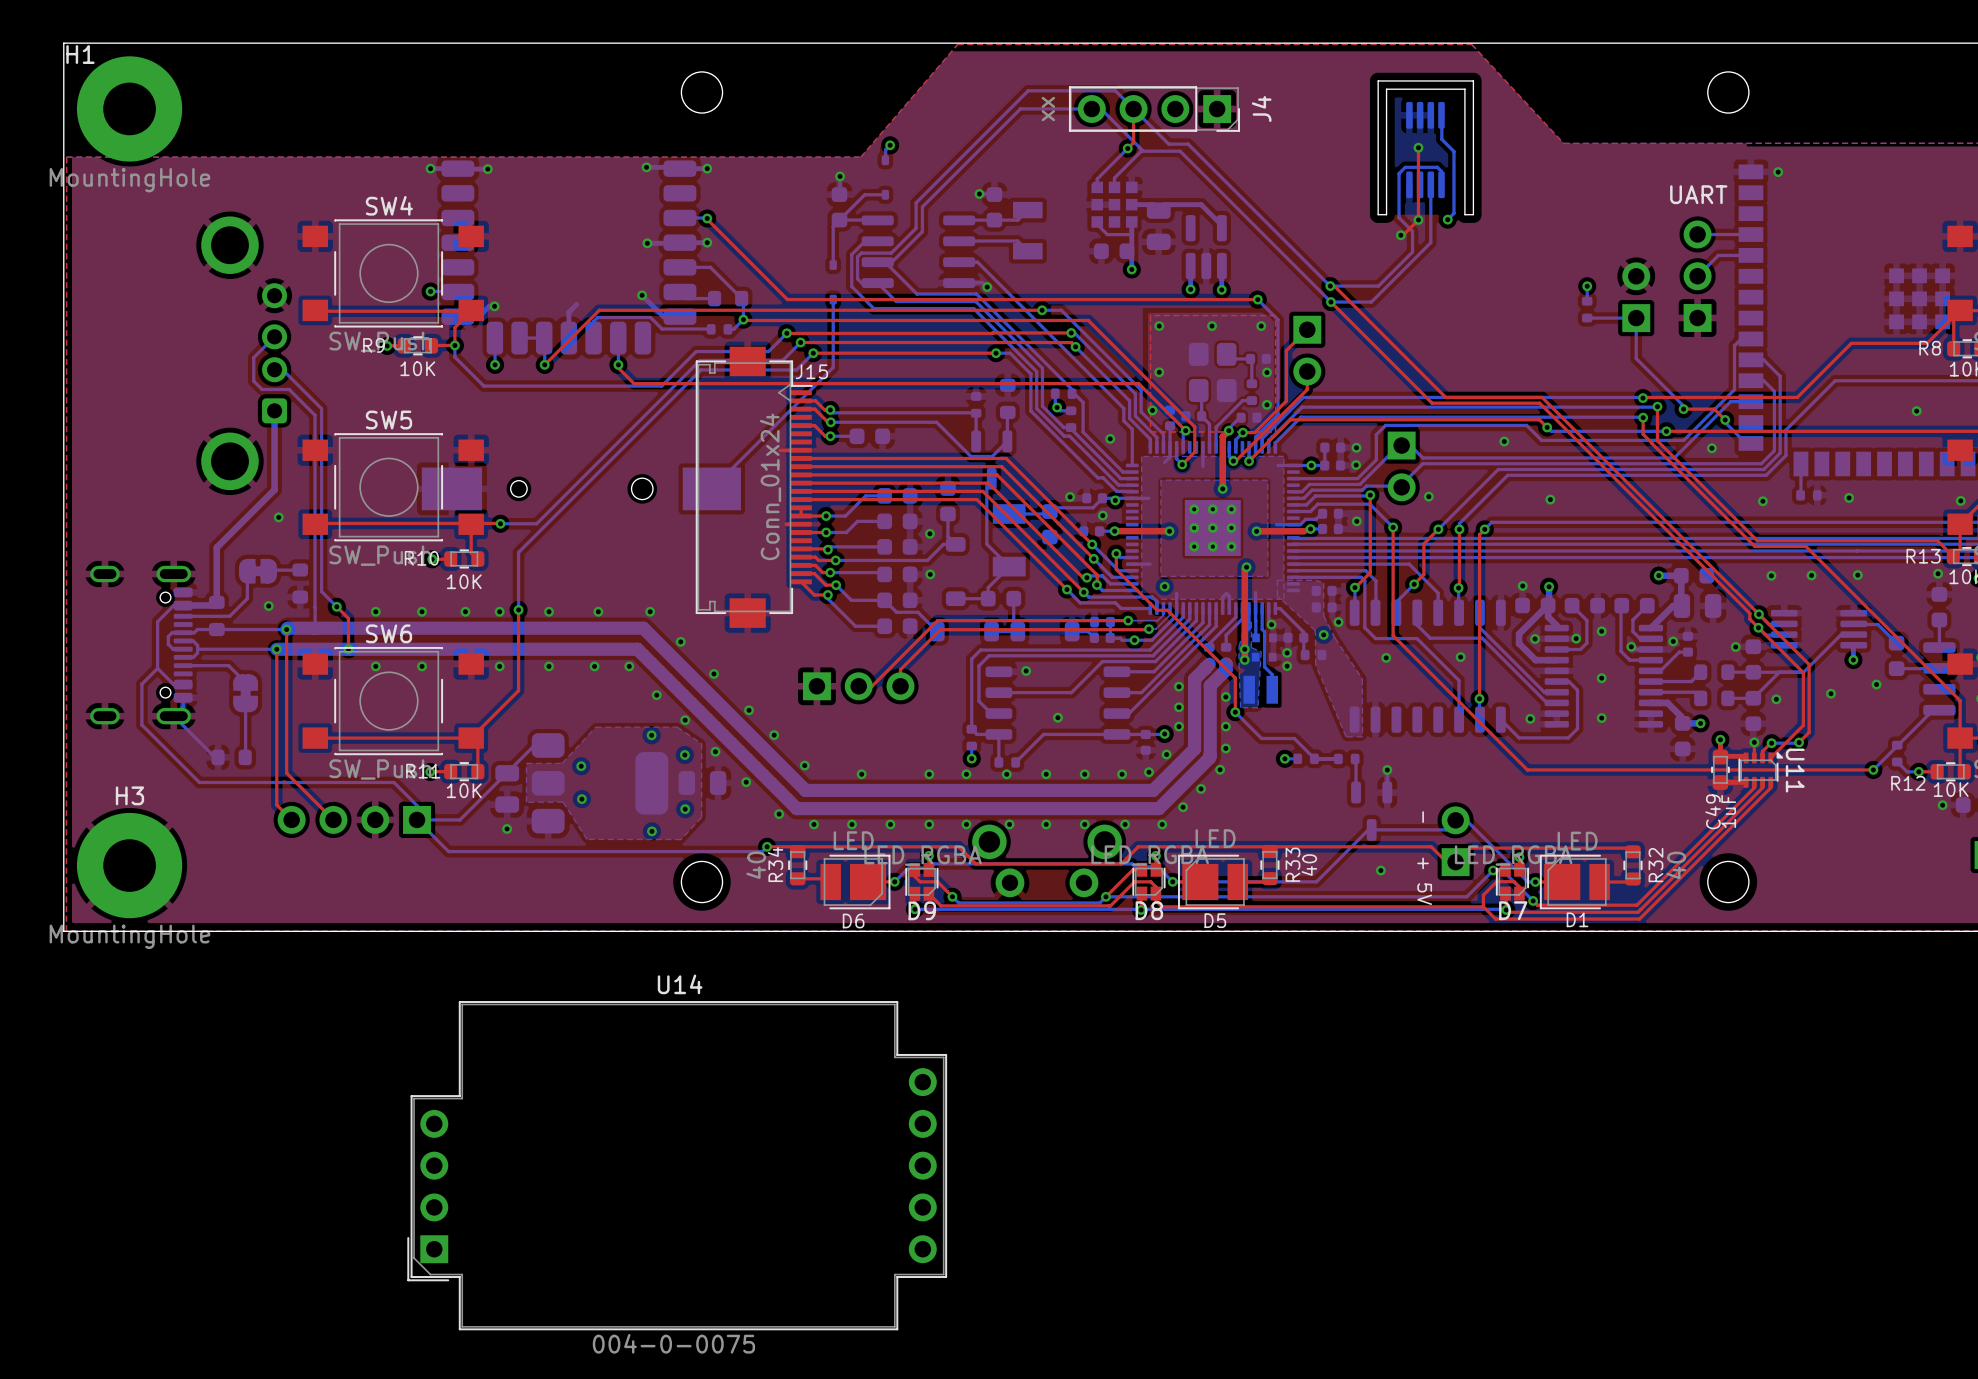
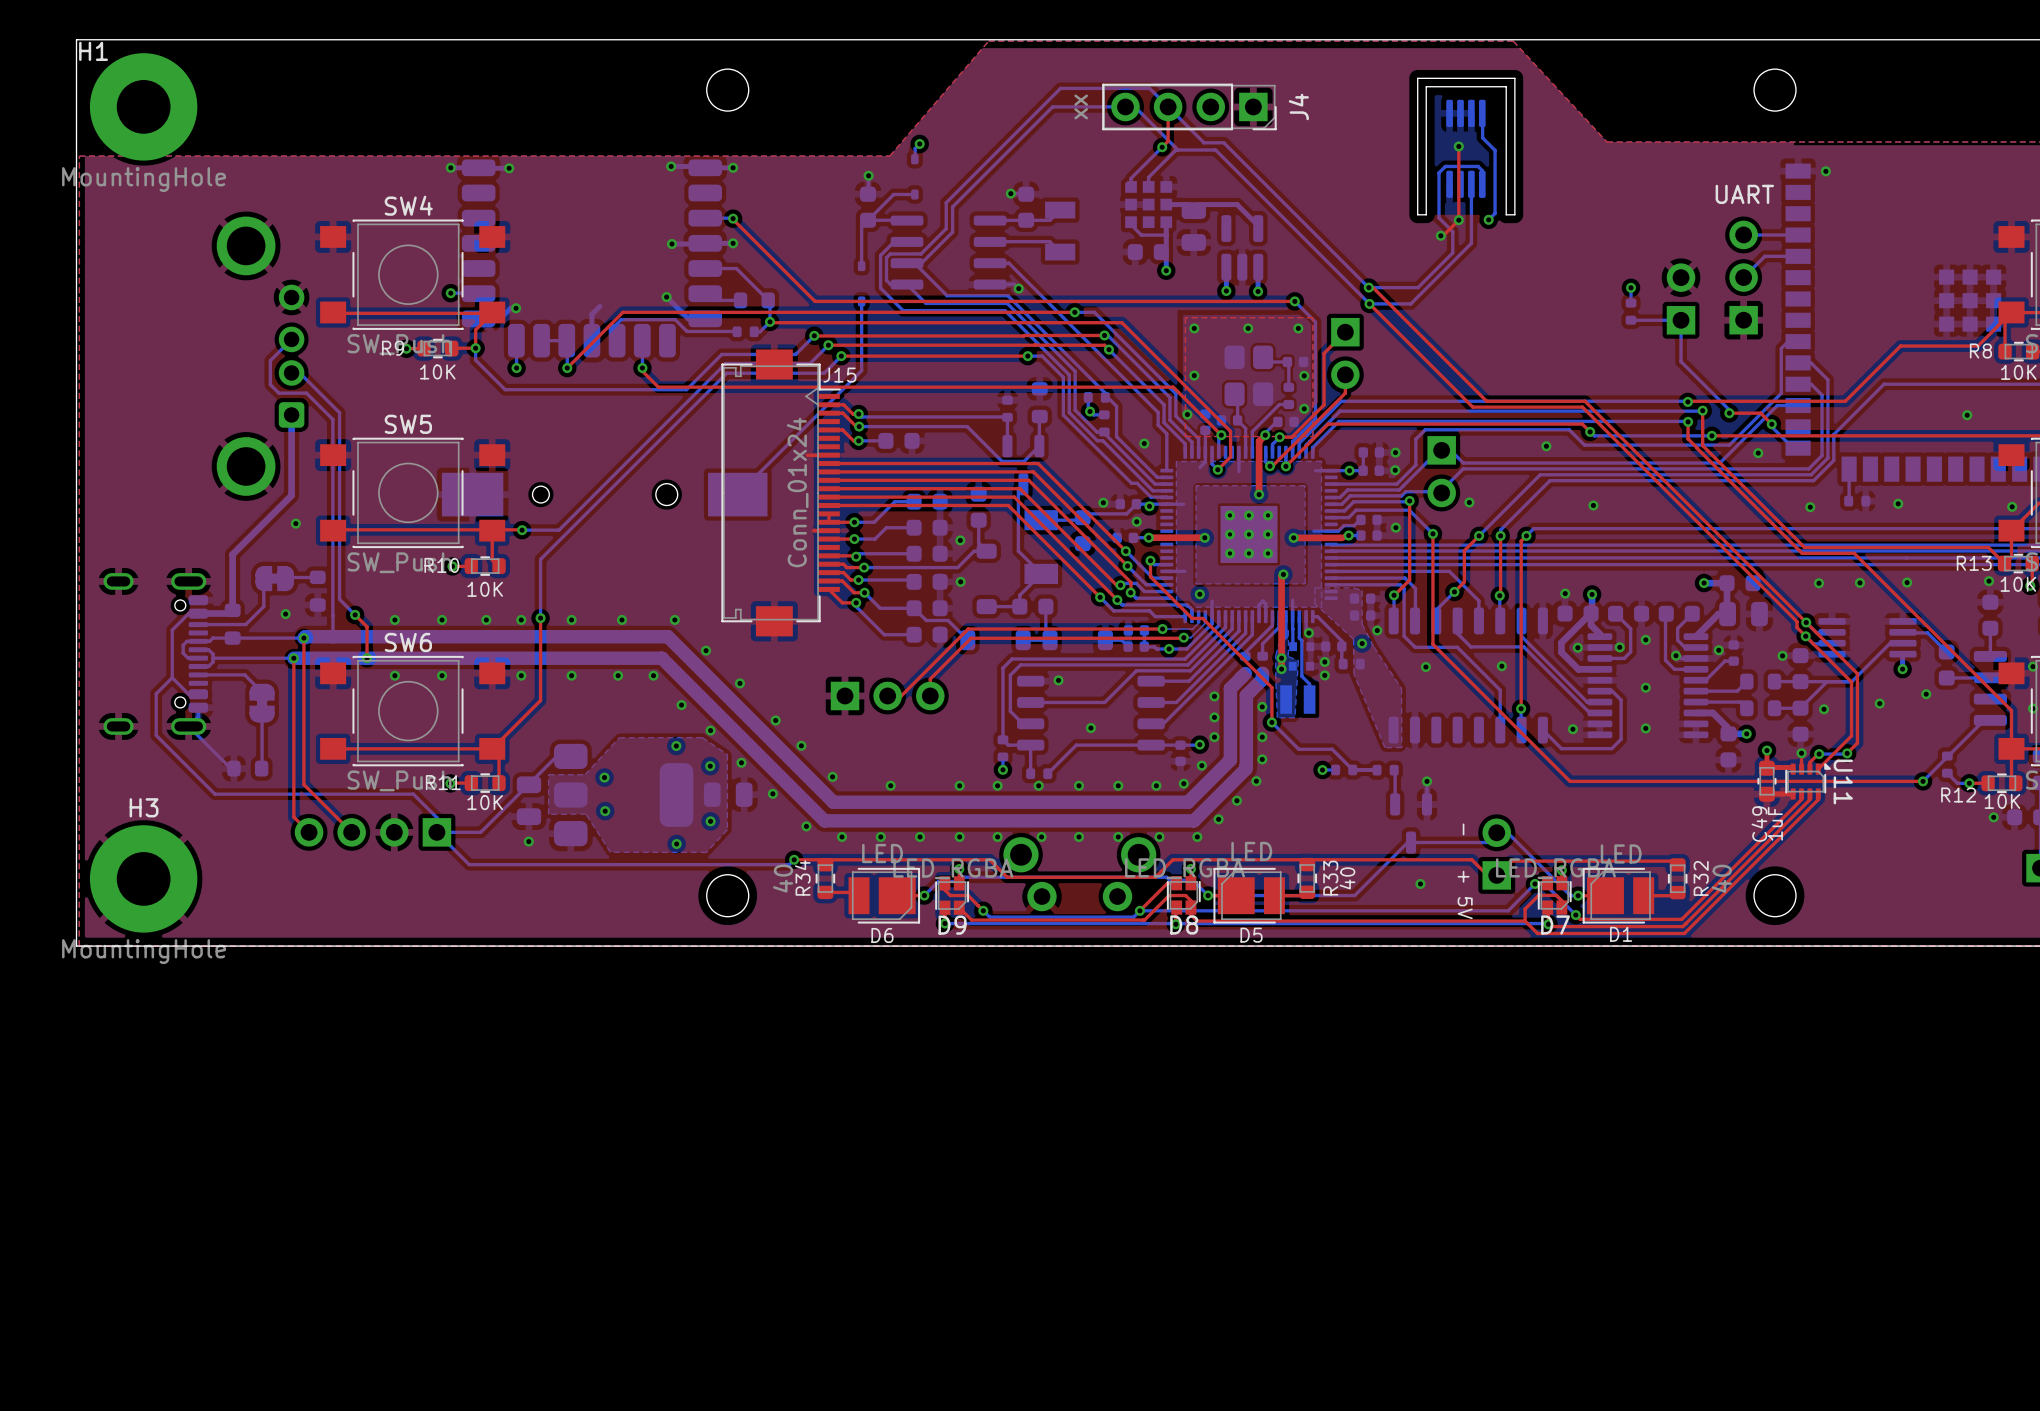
U14: 004-0-0075 (677, 1165) -> none

